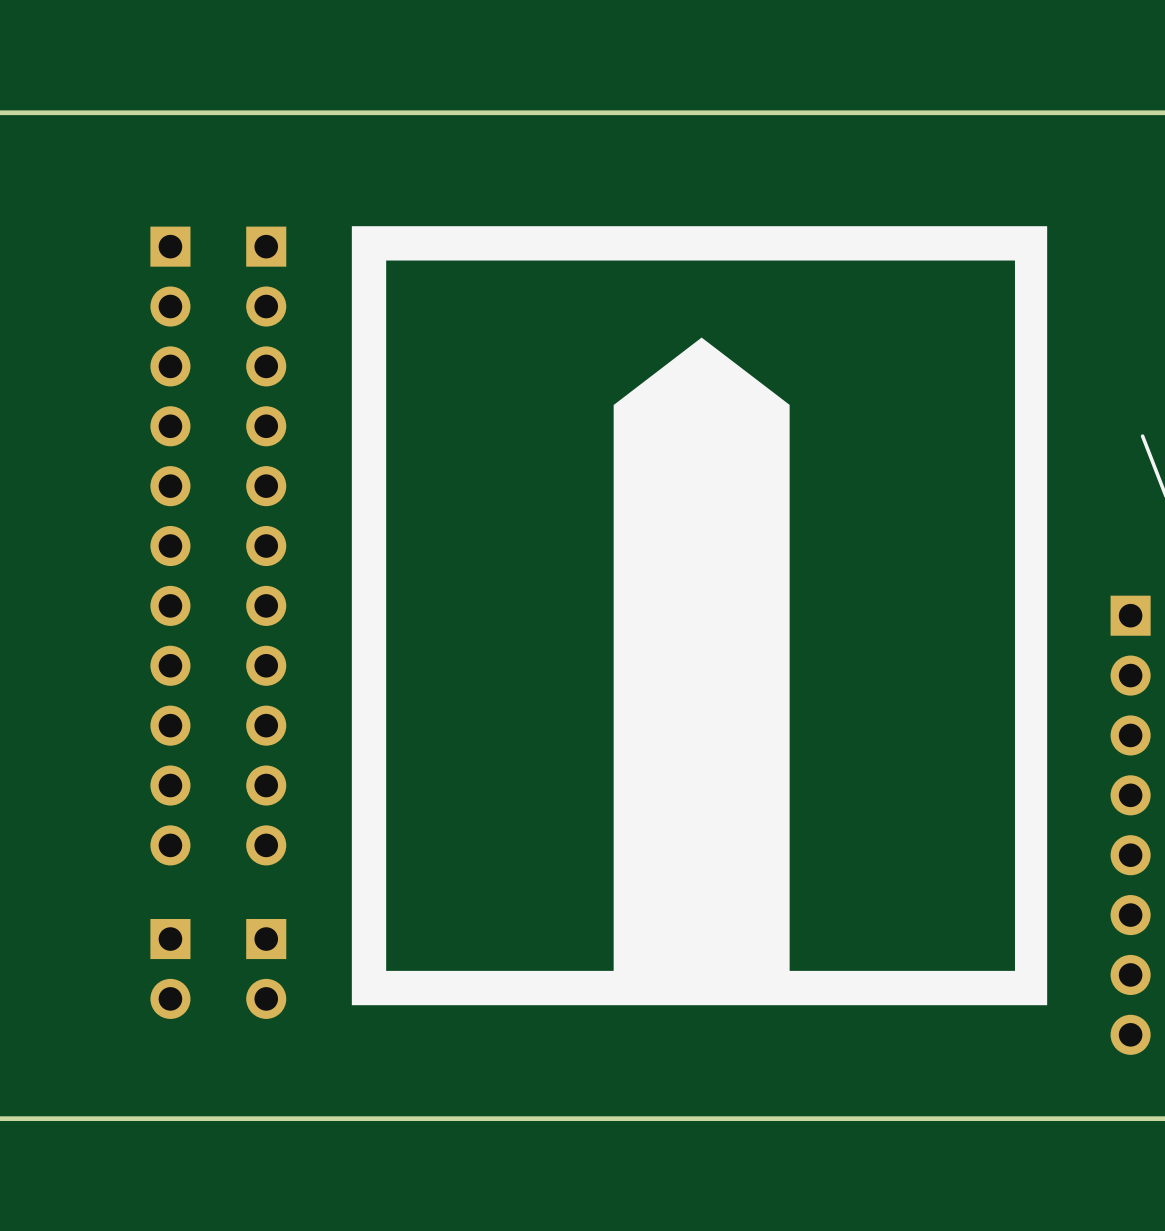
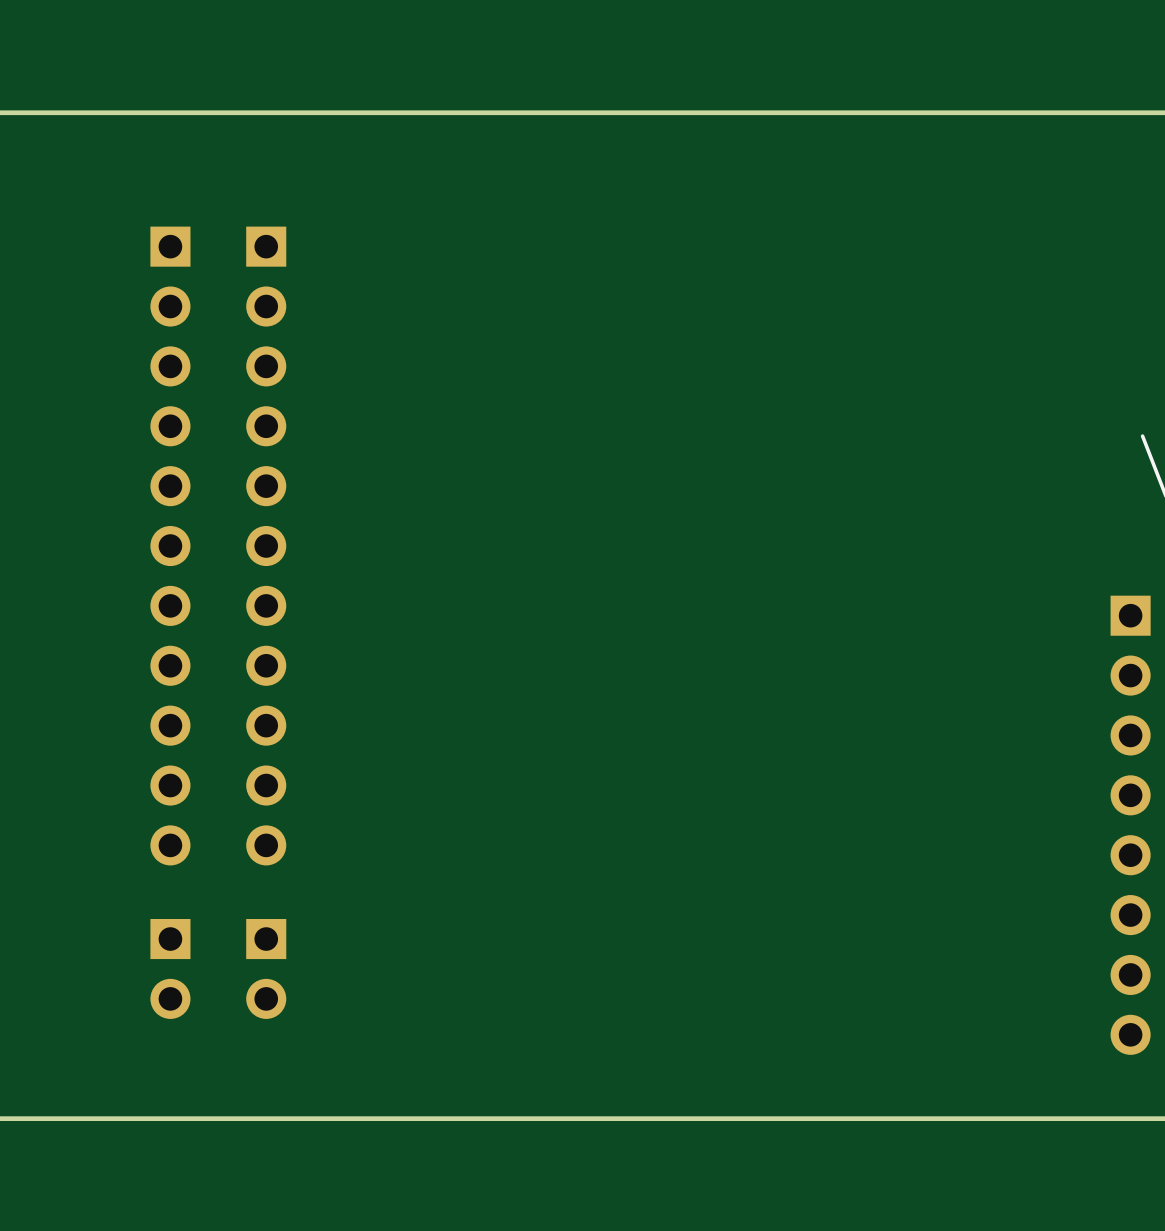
part: (699, 615) -> none

